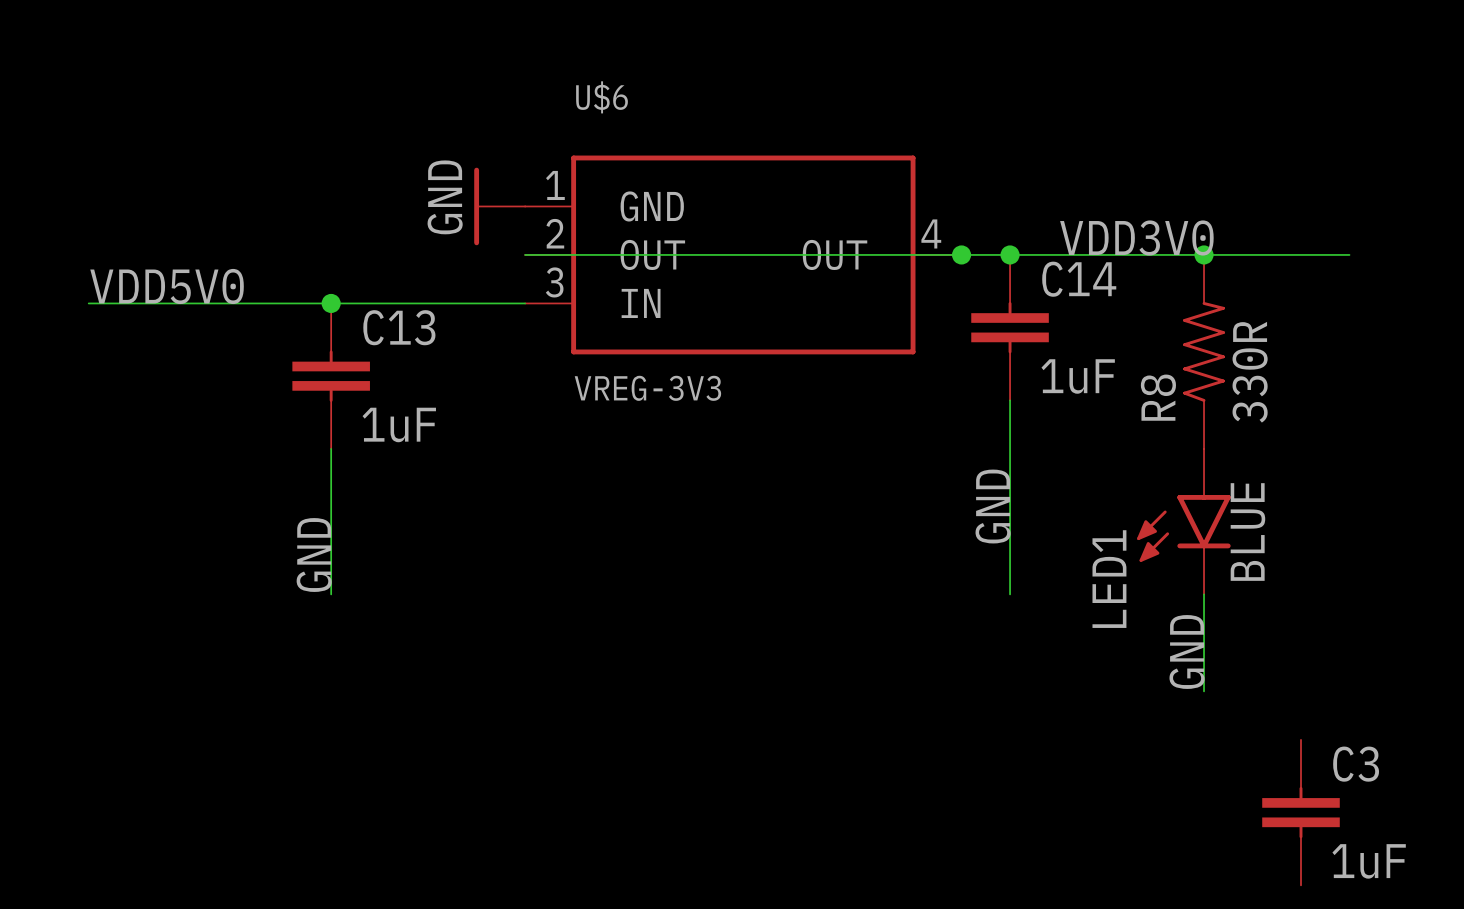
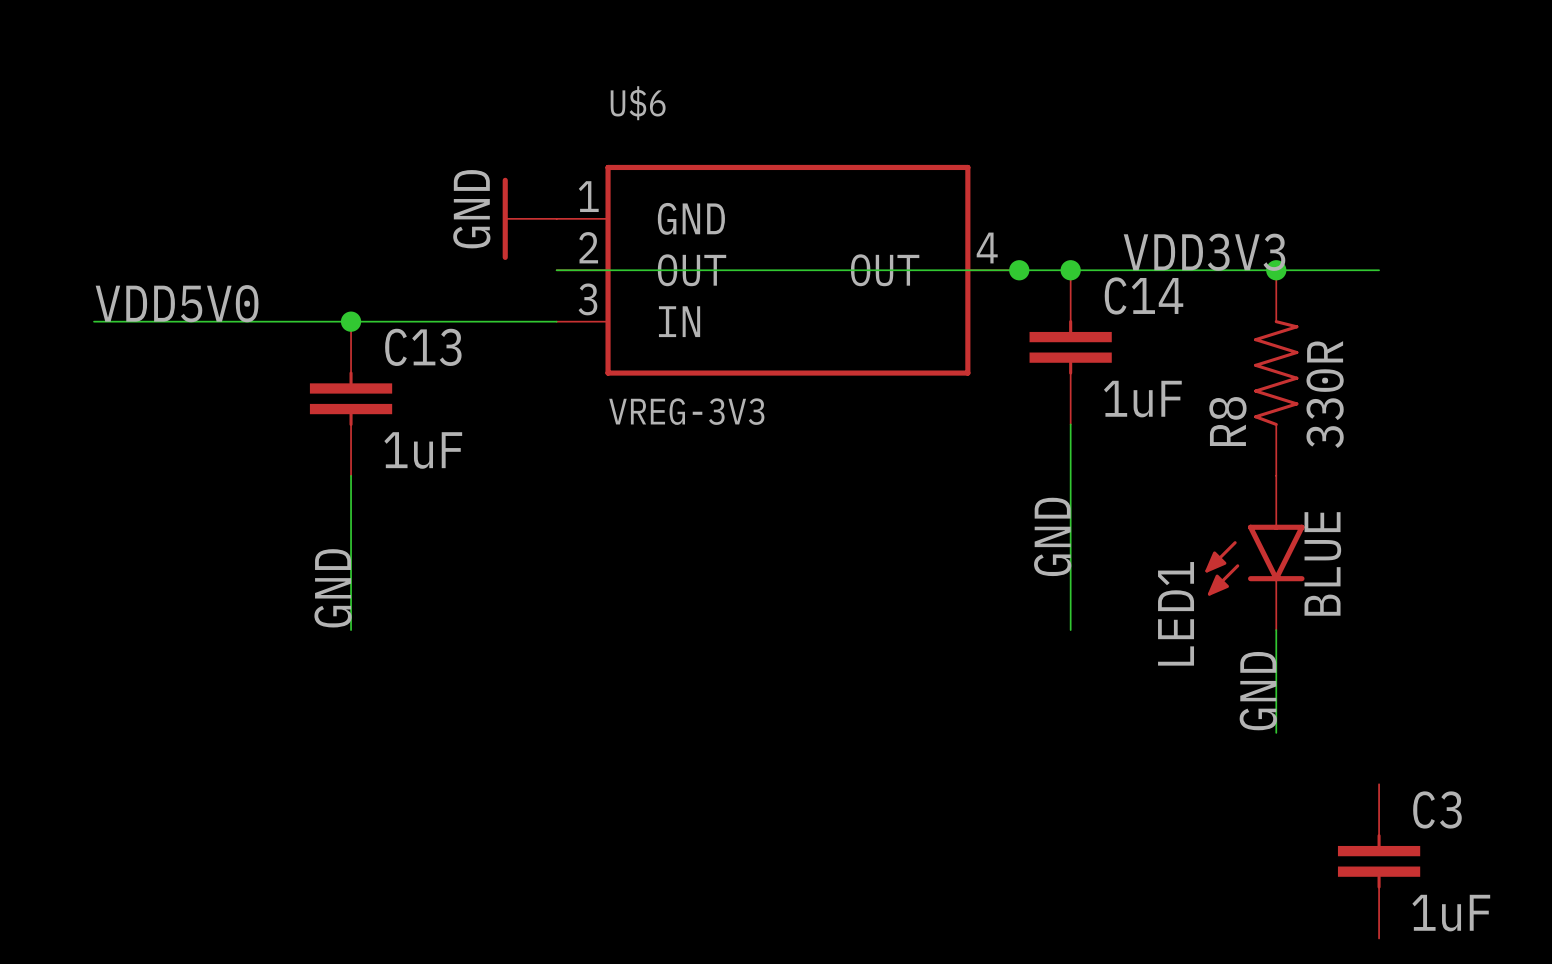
label: VDD3V0 (1136, 237) -> VDD3V3 (1204, 252)
wire: (1301, 254) (1349, 254) -> none

